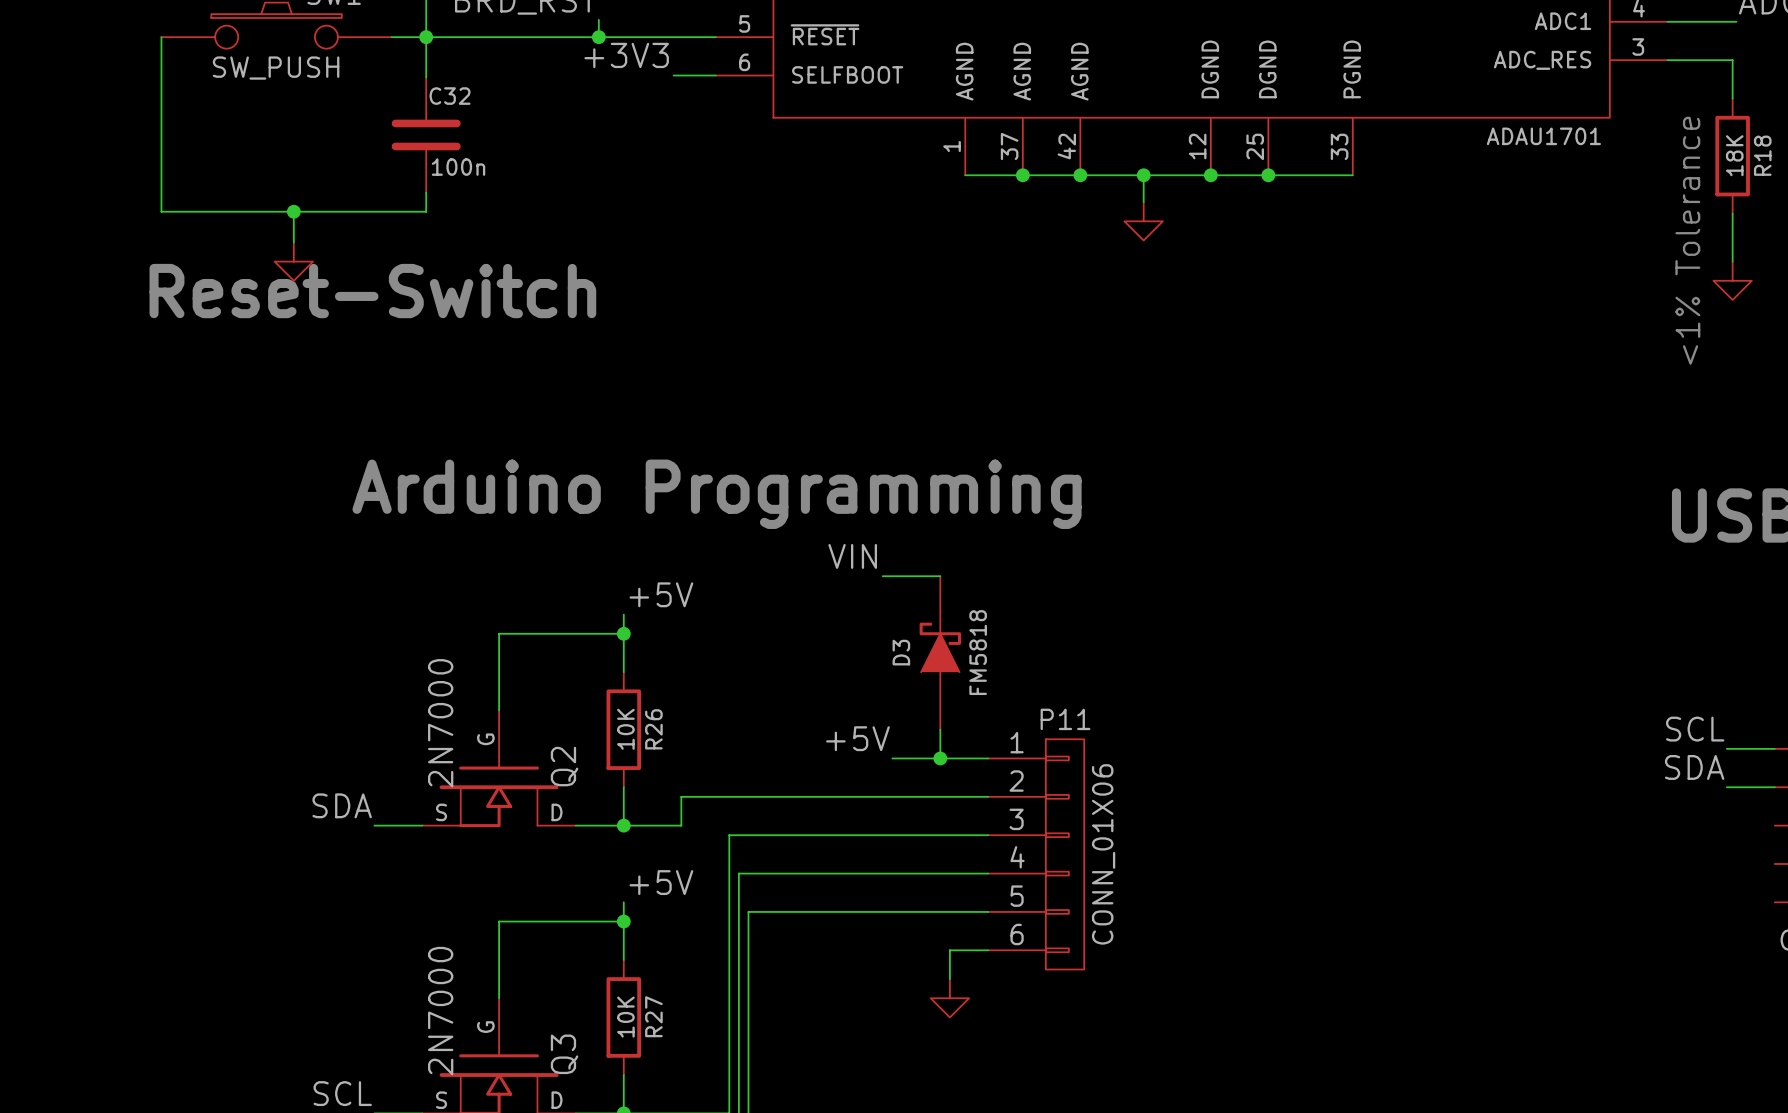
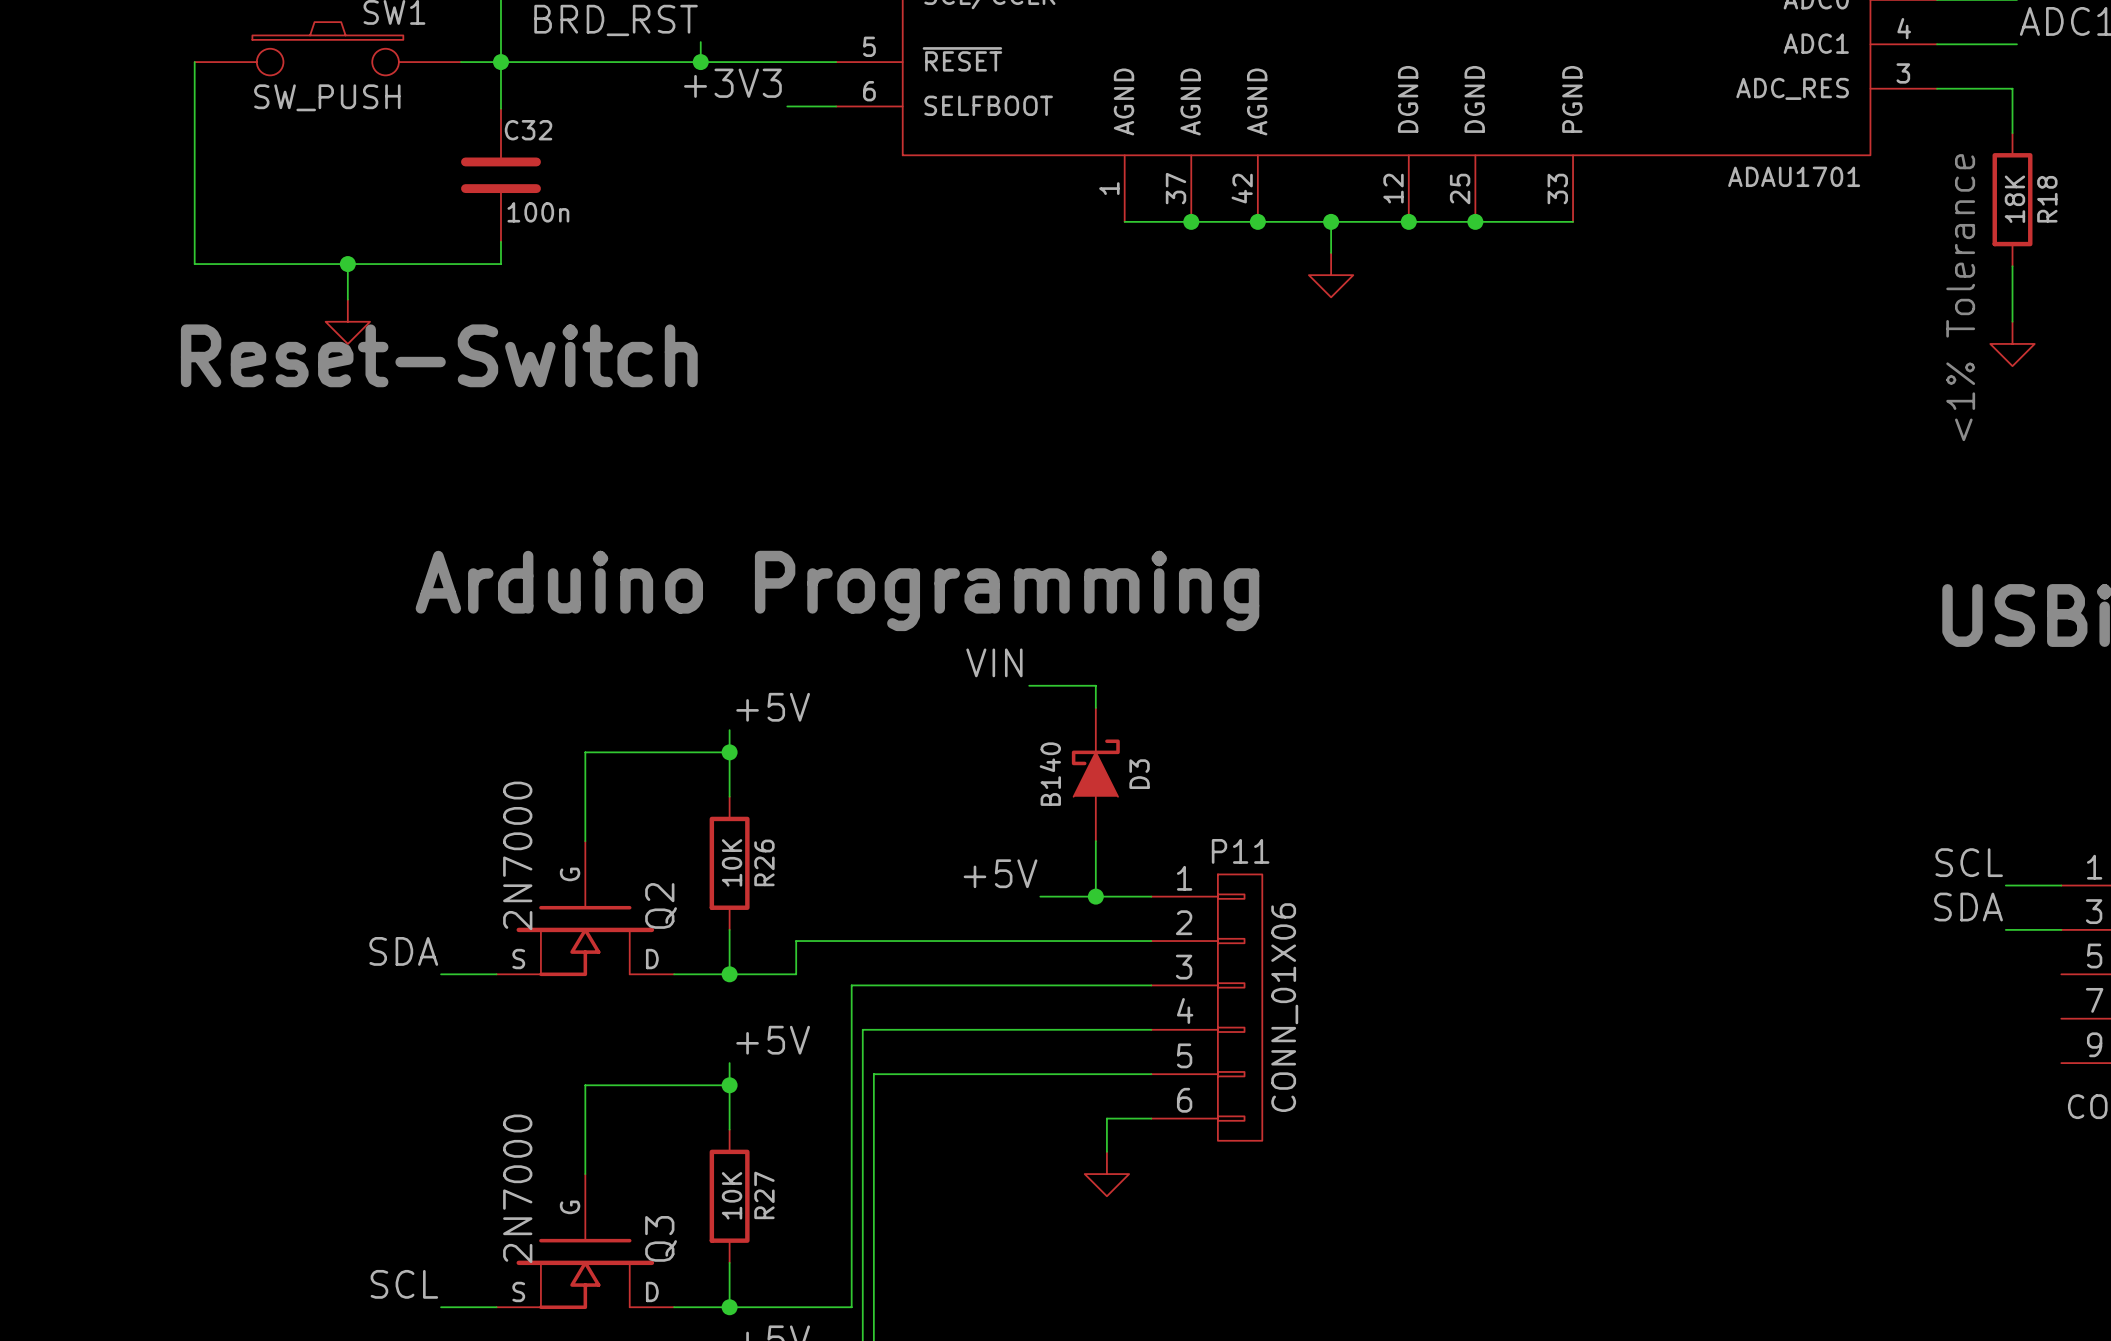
D3 symbol: [919, 576, 962, 730] -> [1071, 707, 1120, 842]
D3 name position: D3 (901, 652) -> D3 (1139, 774)
D3 value: FM5818 (978, 652) -> B140 (1050, 774)

